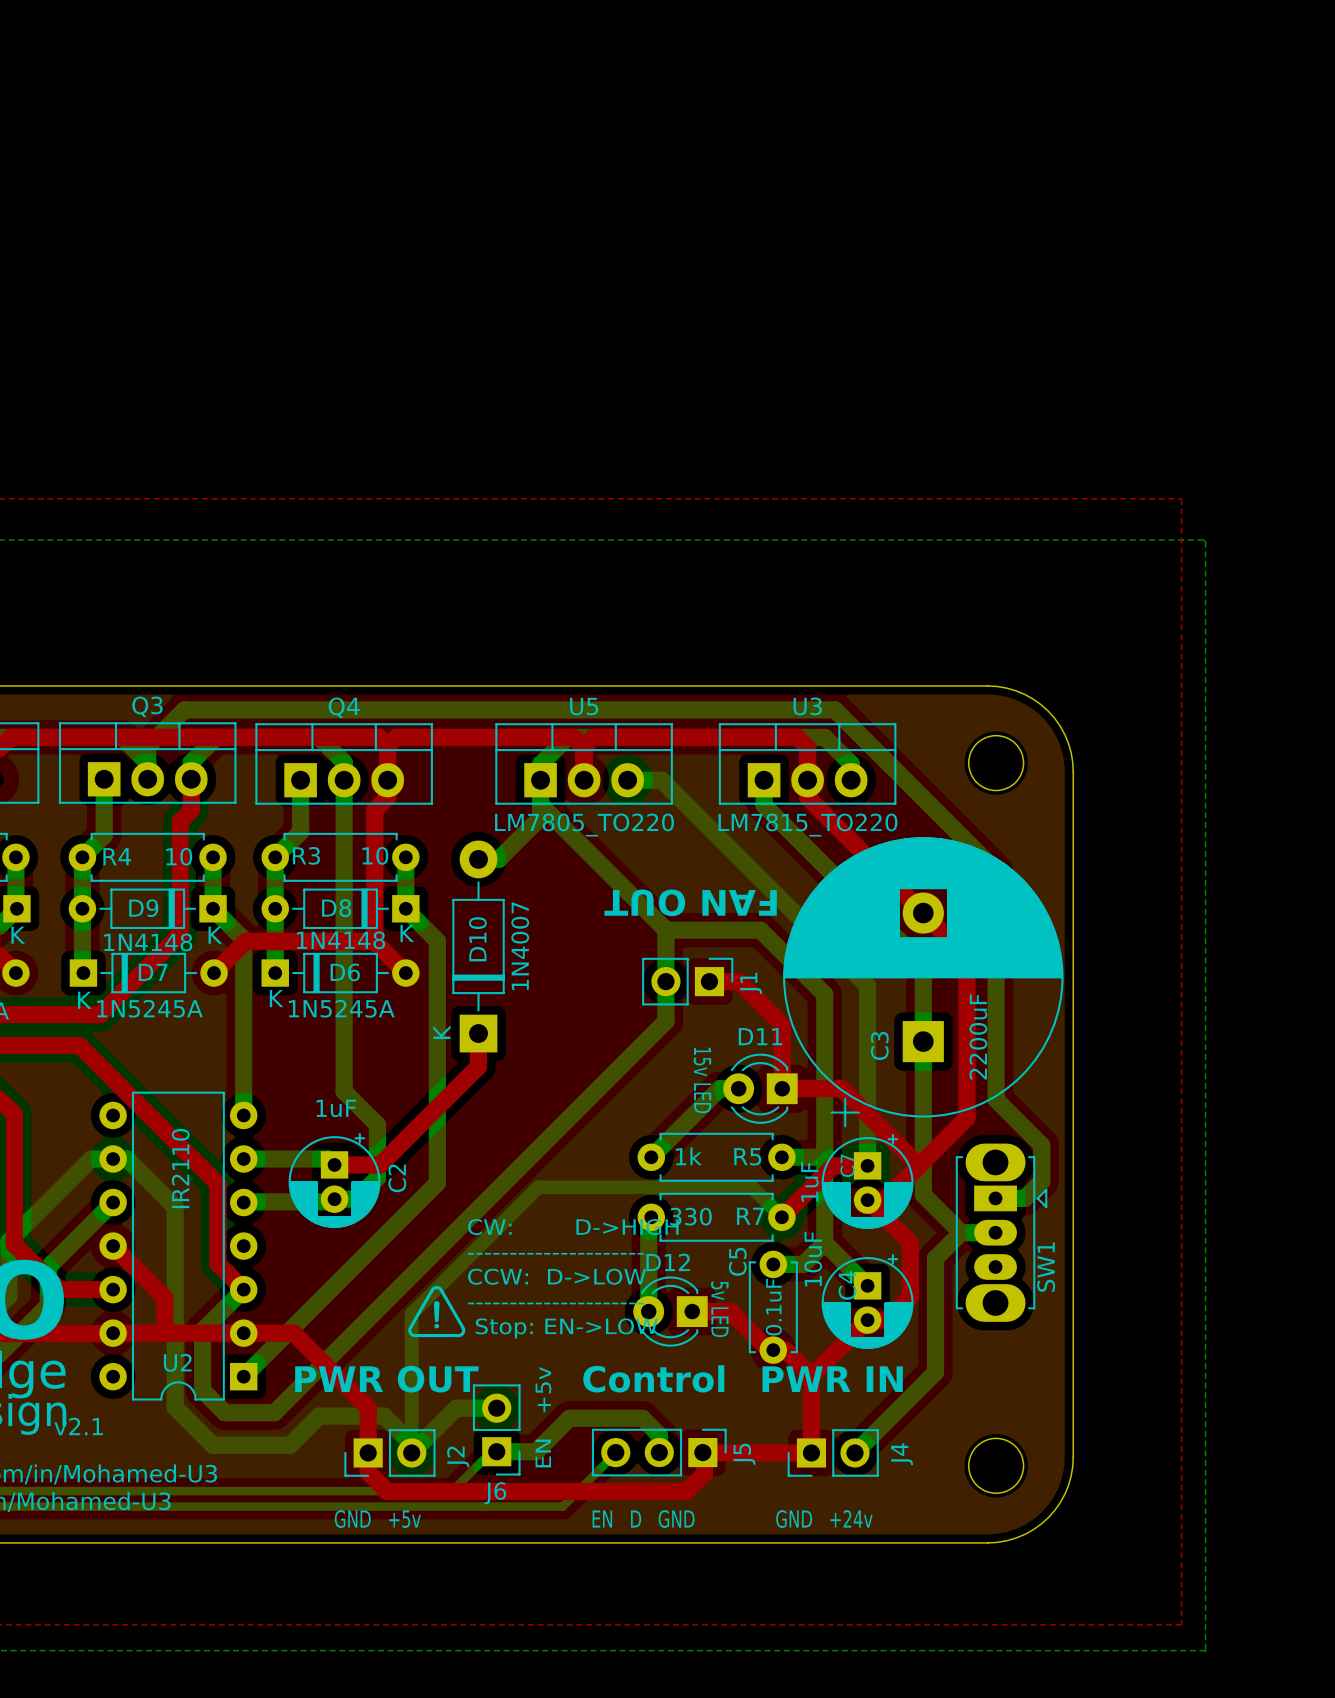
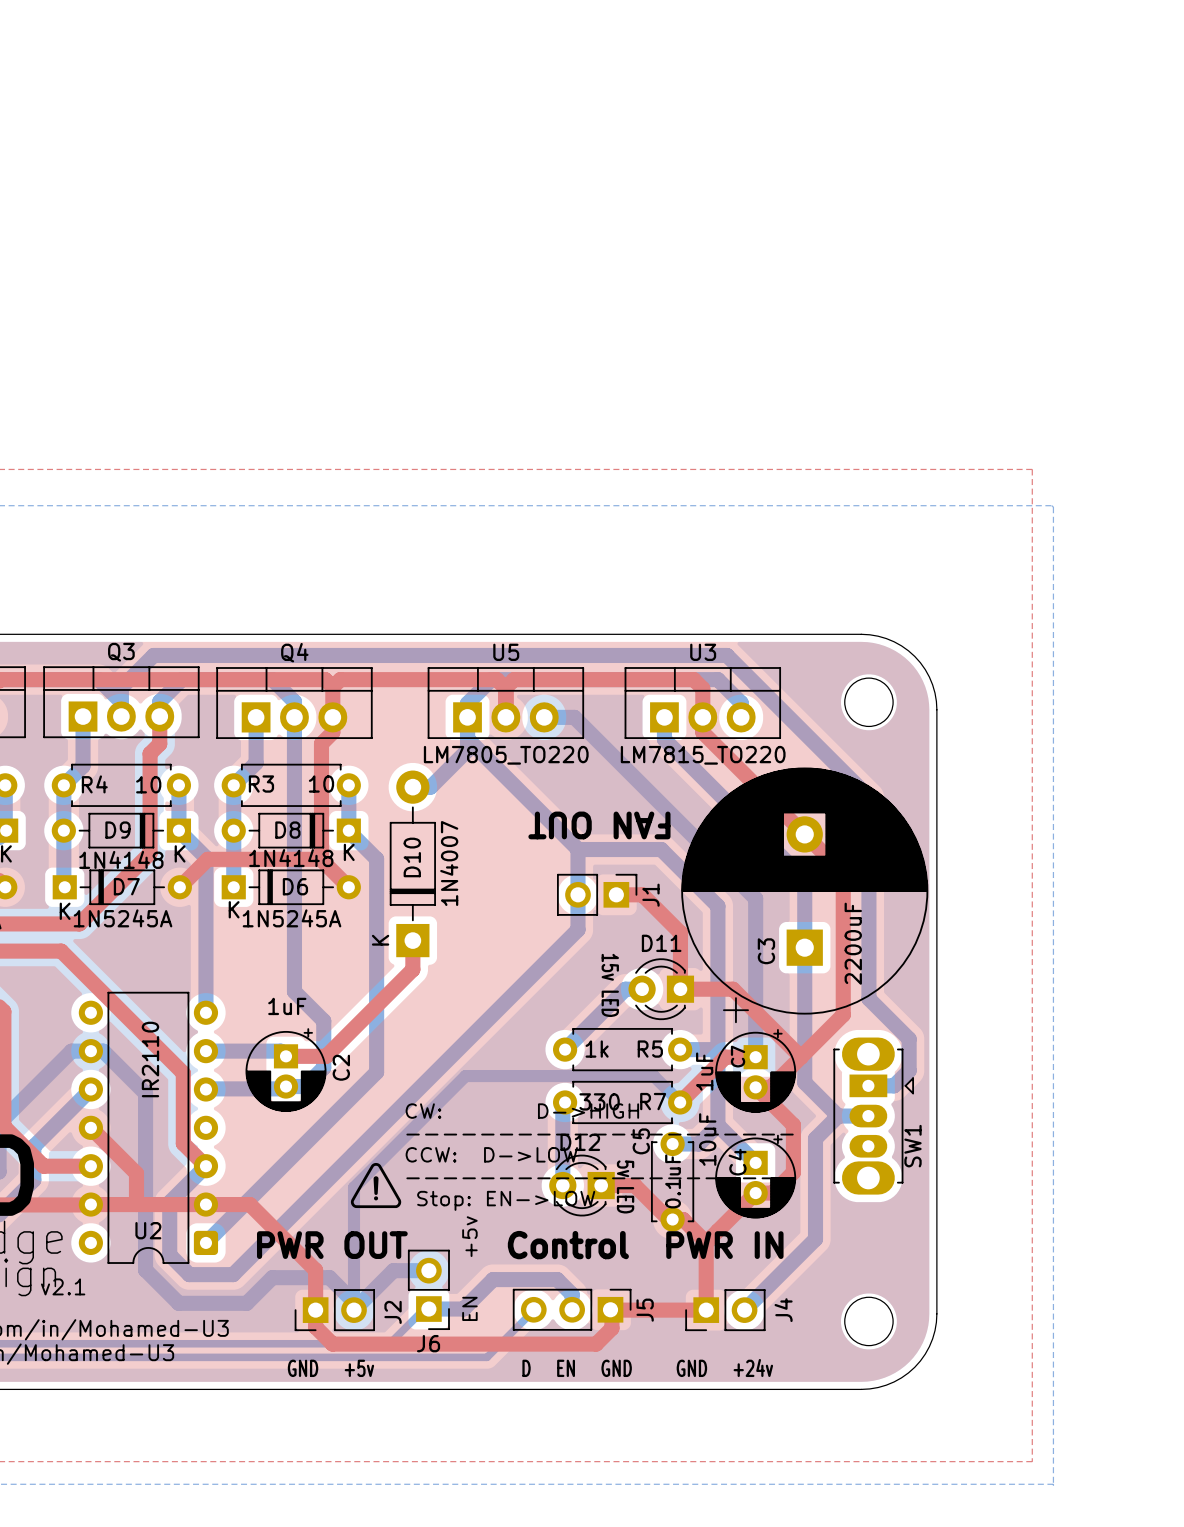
U2 footprint: [99, 1091, 258, 1401] -> [78, 991, 219, 1264]
text: EN D GND (643, 1519) -> D EN GND (577, 1368)

